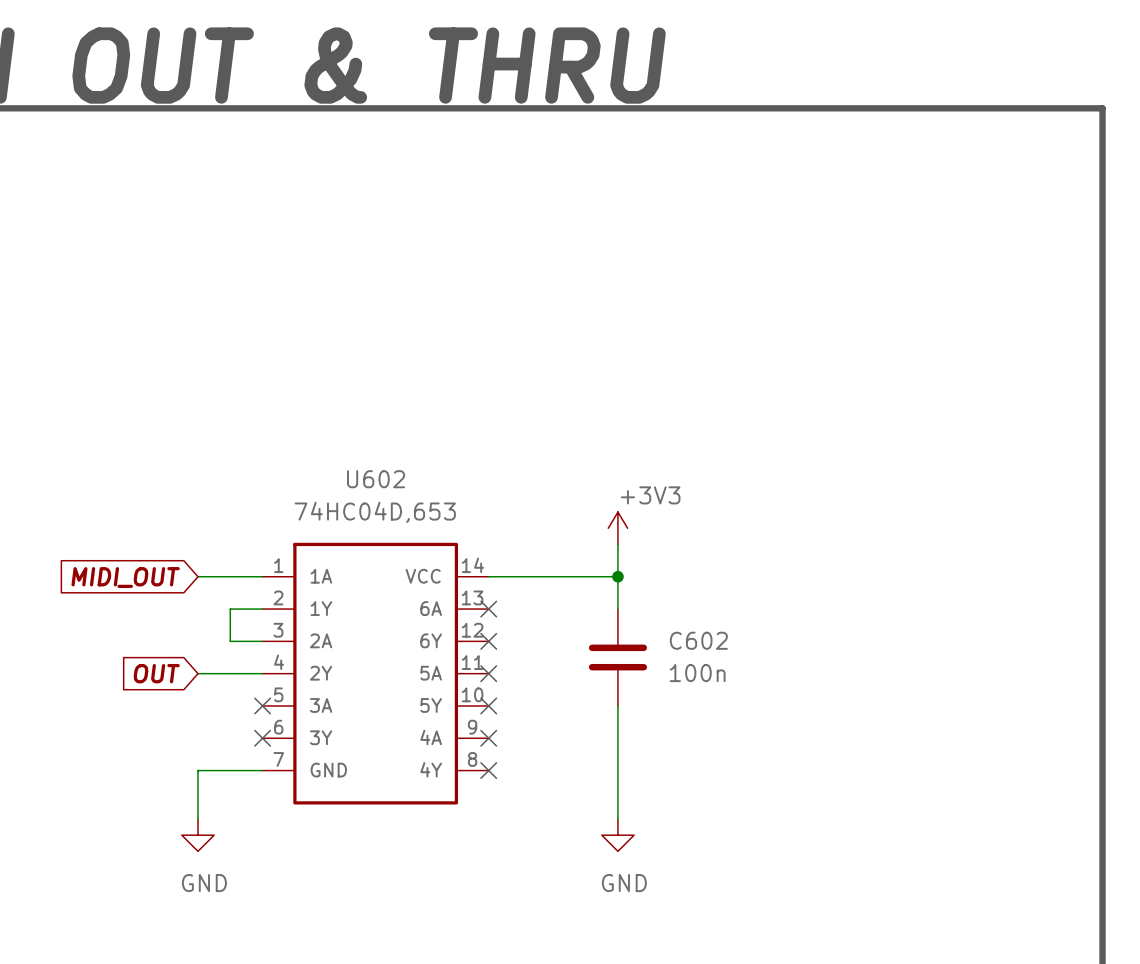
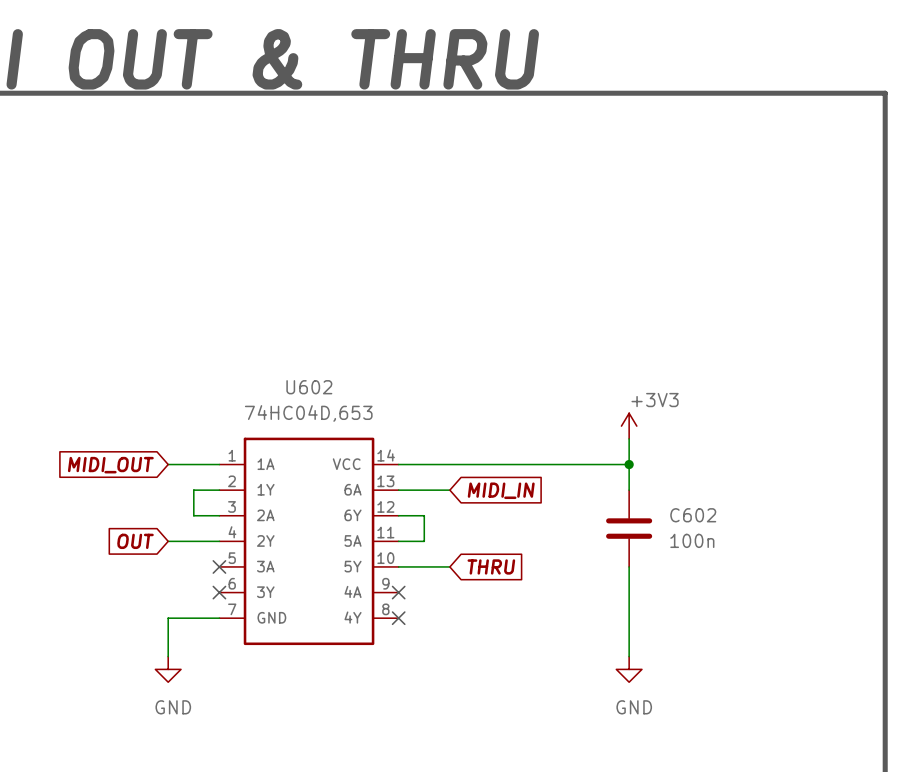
power symbol position: +3V3 (617, 528) -> +3V3 (629, 426)
wire: (617, 544) (617, 609) -> (629, 438) (629, 490)
wire: none -> (501, 464) (629, 464)
junction: (617, 576) -> none
junction: none -> (629, 464)
wire: none -> (398, 490) (449, 490)
no-connect mark: (488, 609) -> none
global label: none -> MIDI_IN (501, 490)
wire: none -> (398, 515) (424, 515) (424, 541) (398, 541)
no-connect mark: (488, 641) -> none
C602 position: (617, 657) -> (629, 528)
no-connect mark: (488, 673) -> none
wire: none -> (398, 566) (449, 566)
no-connect mark: (488, 705) -> none
global label: none -> THRU (491, 566)
wire: (617, 705) (617, 819) -> (629, 566) (629, 656)
power symbol position: GND (617, 835) -> GND (629, 669)

